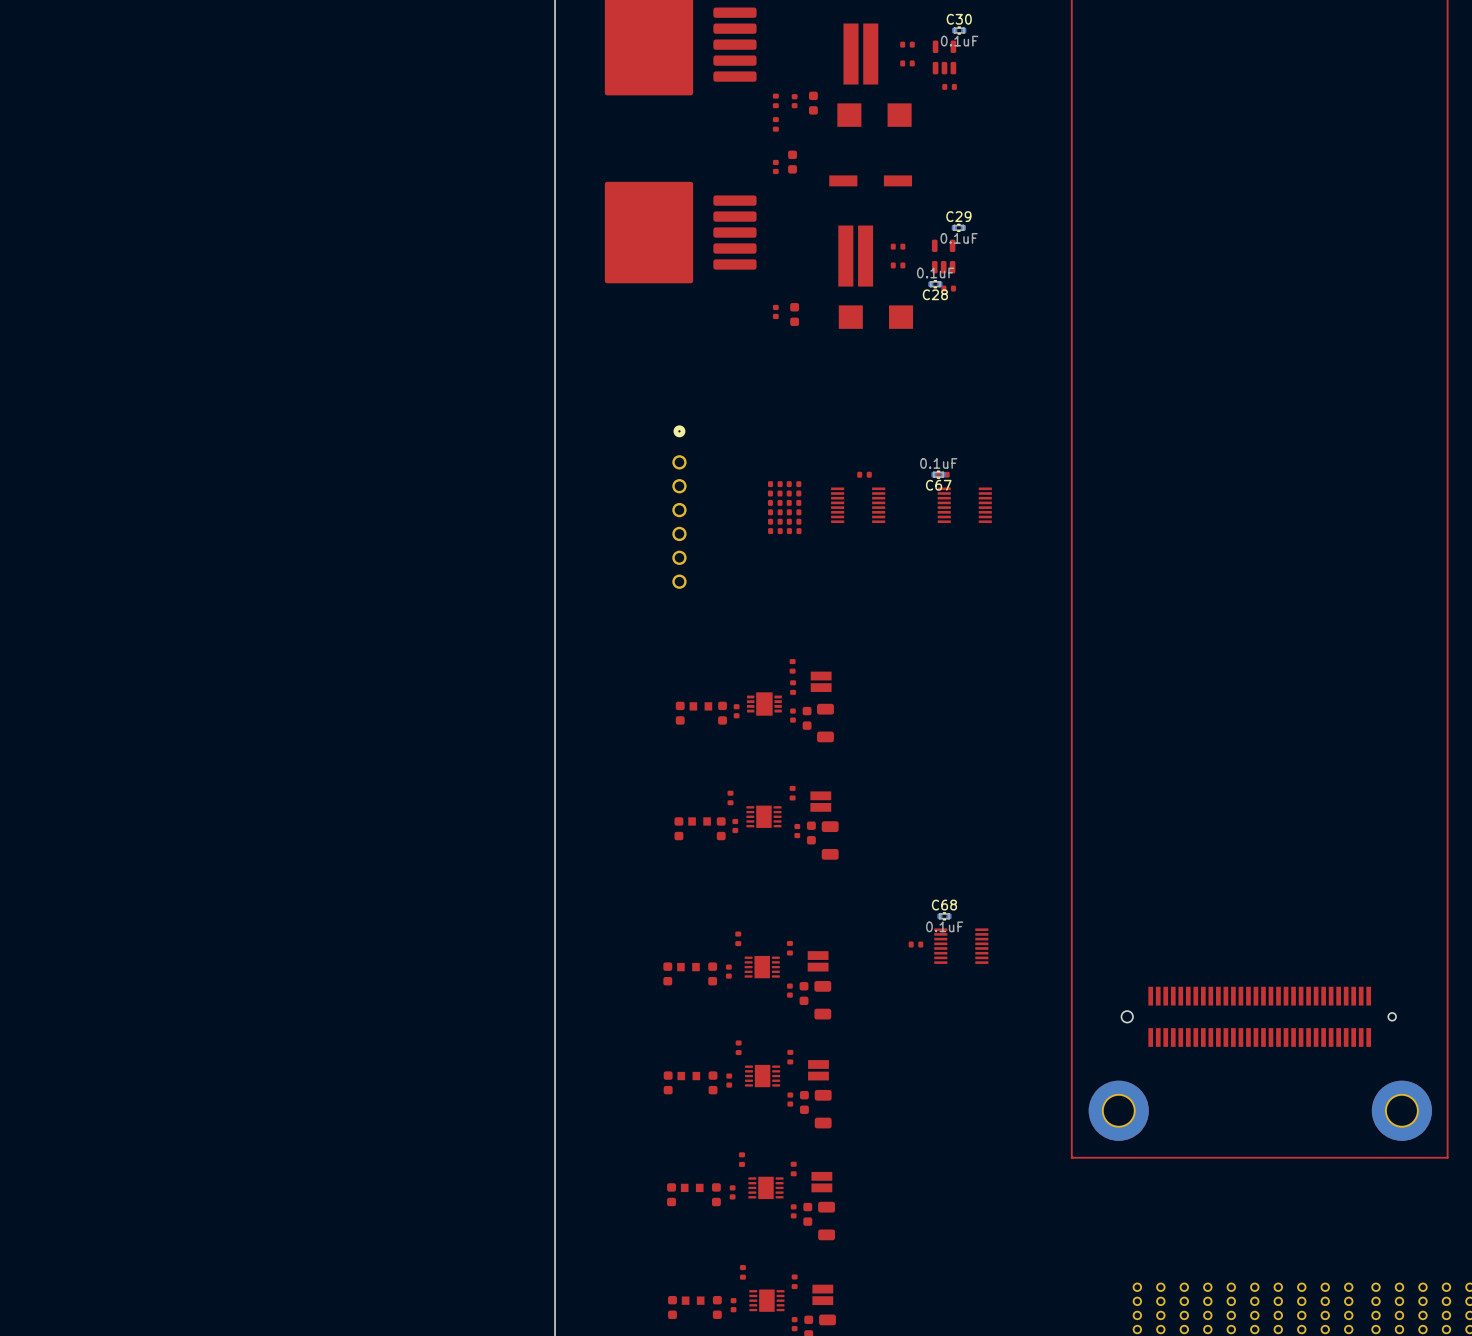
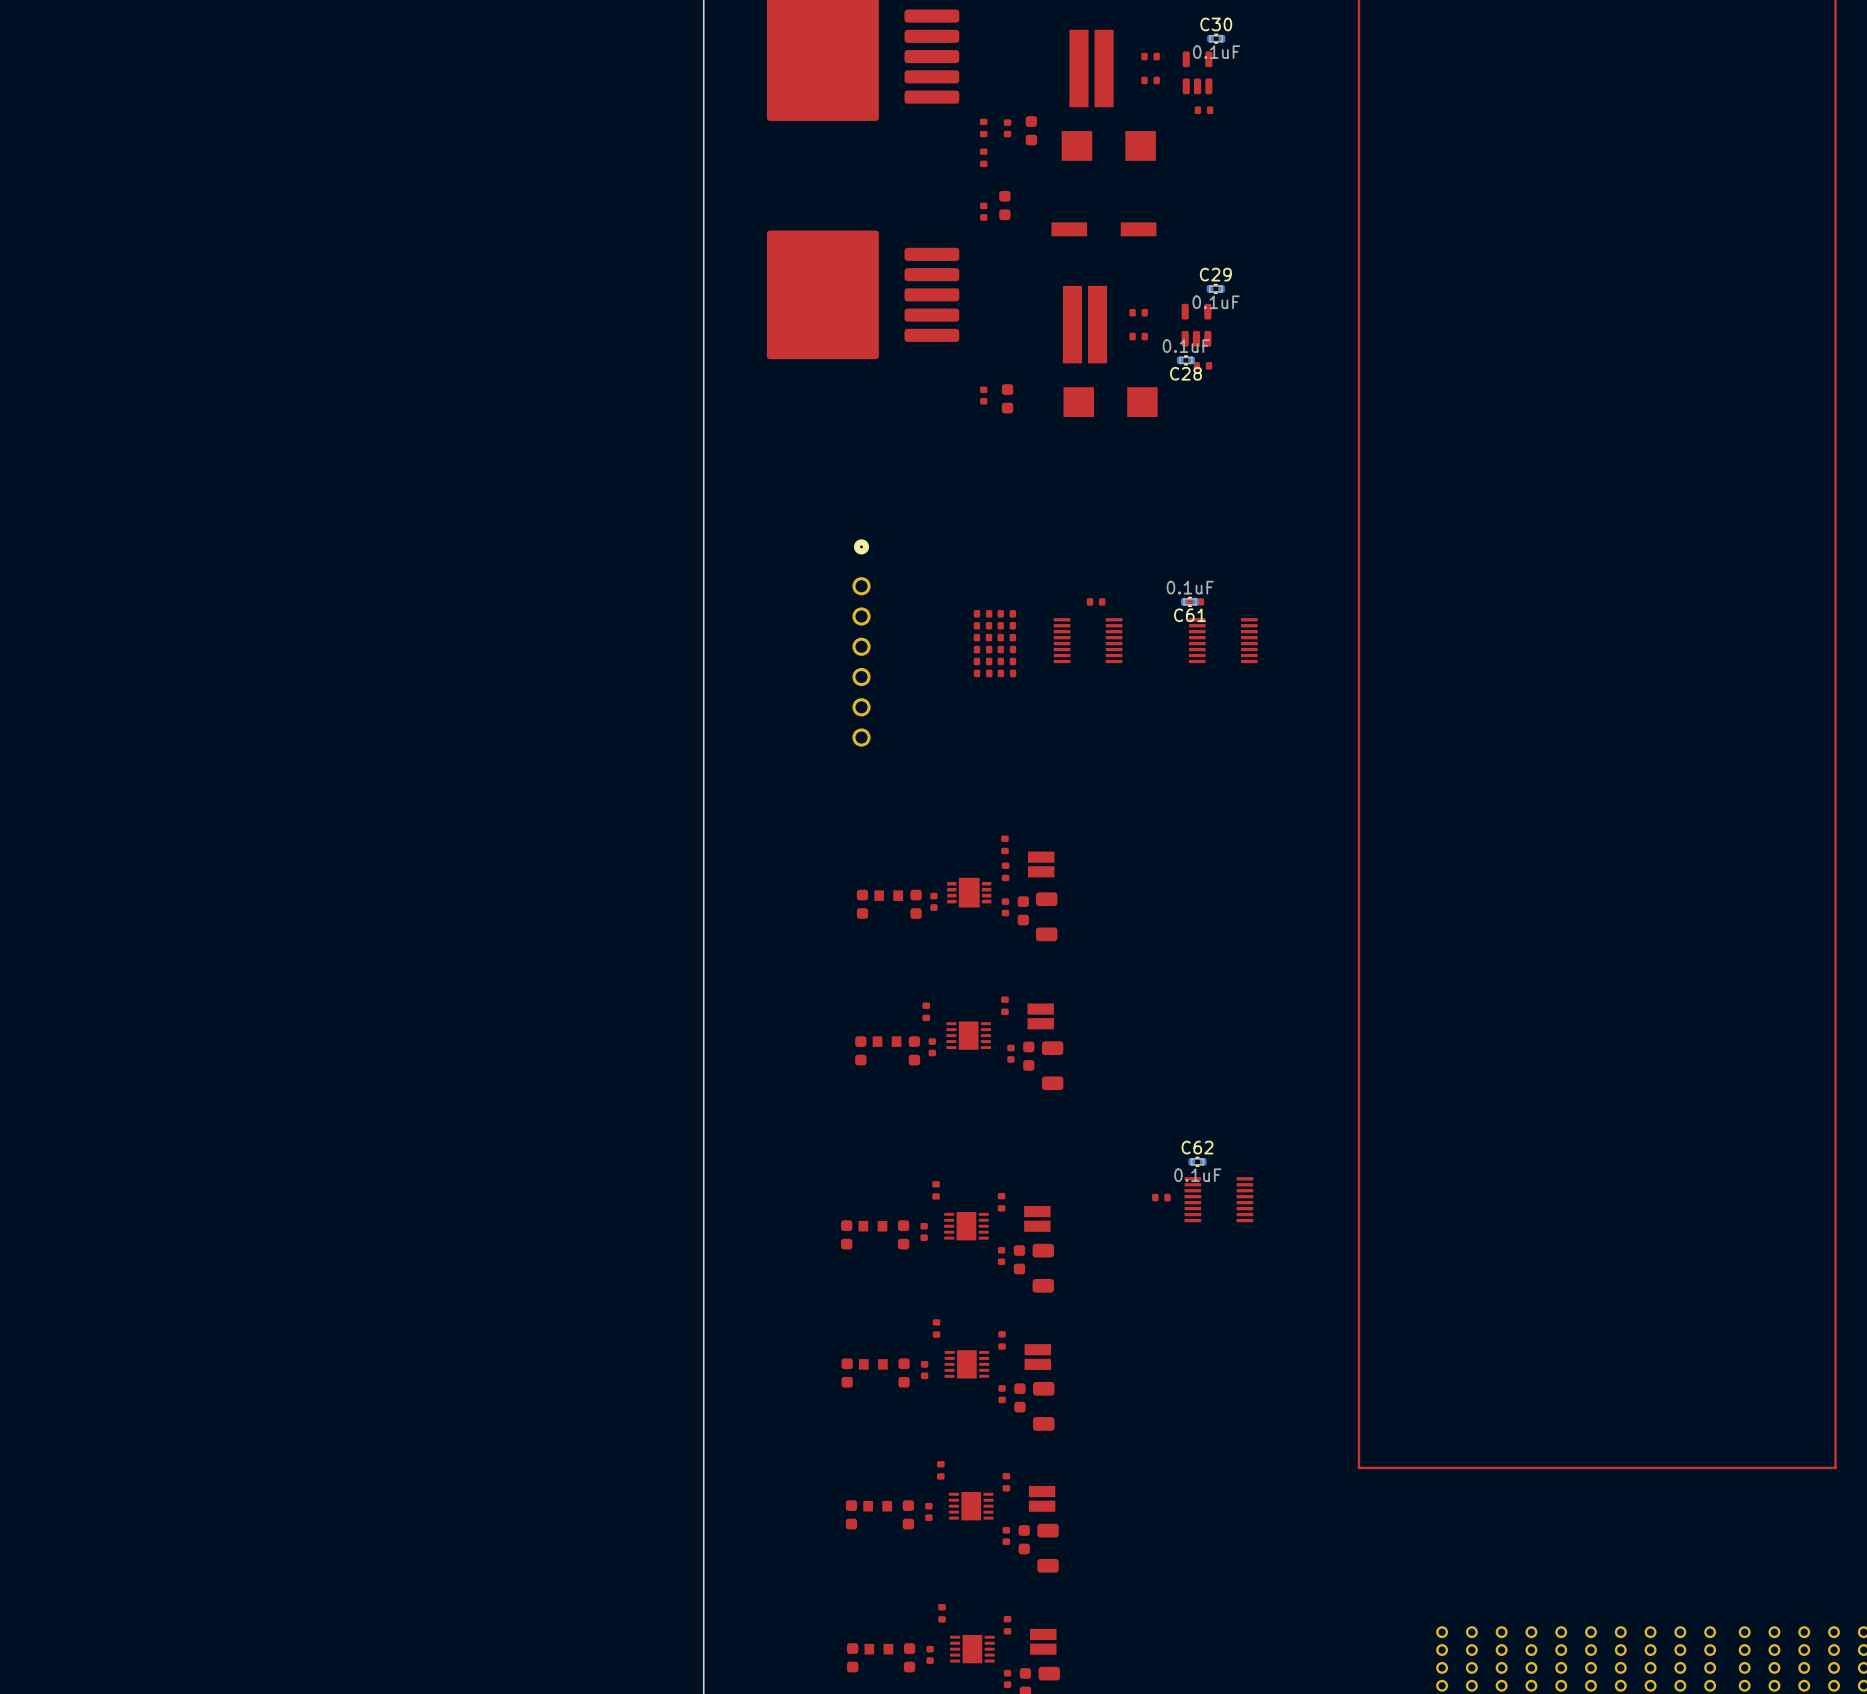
C67 name: C67 (938, 485) -> C61 (1189, 615)
C68 name: C68 (944, 905) -> C62 (1197, 1147)
part: (1258, 1016) -> none
part: (1118, 1110) -> none
part: (1401, 1110) -> none

